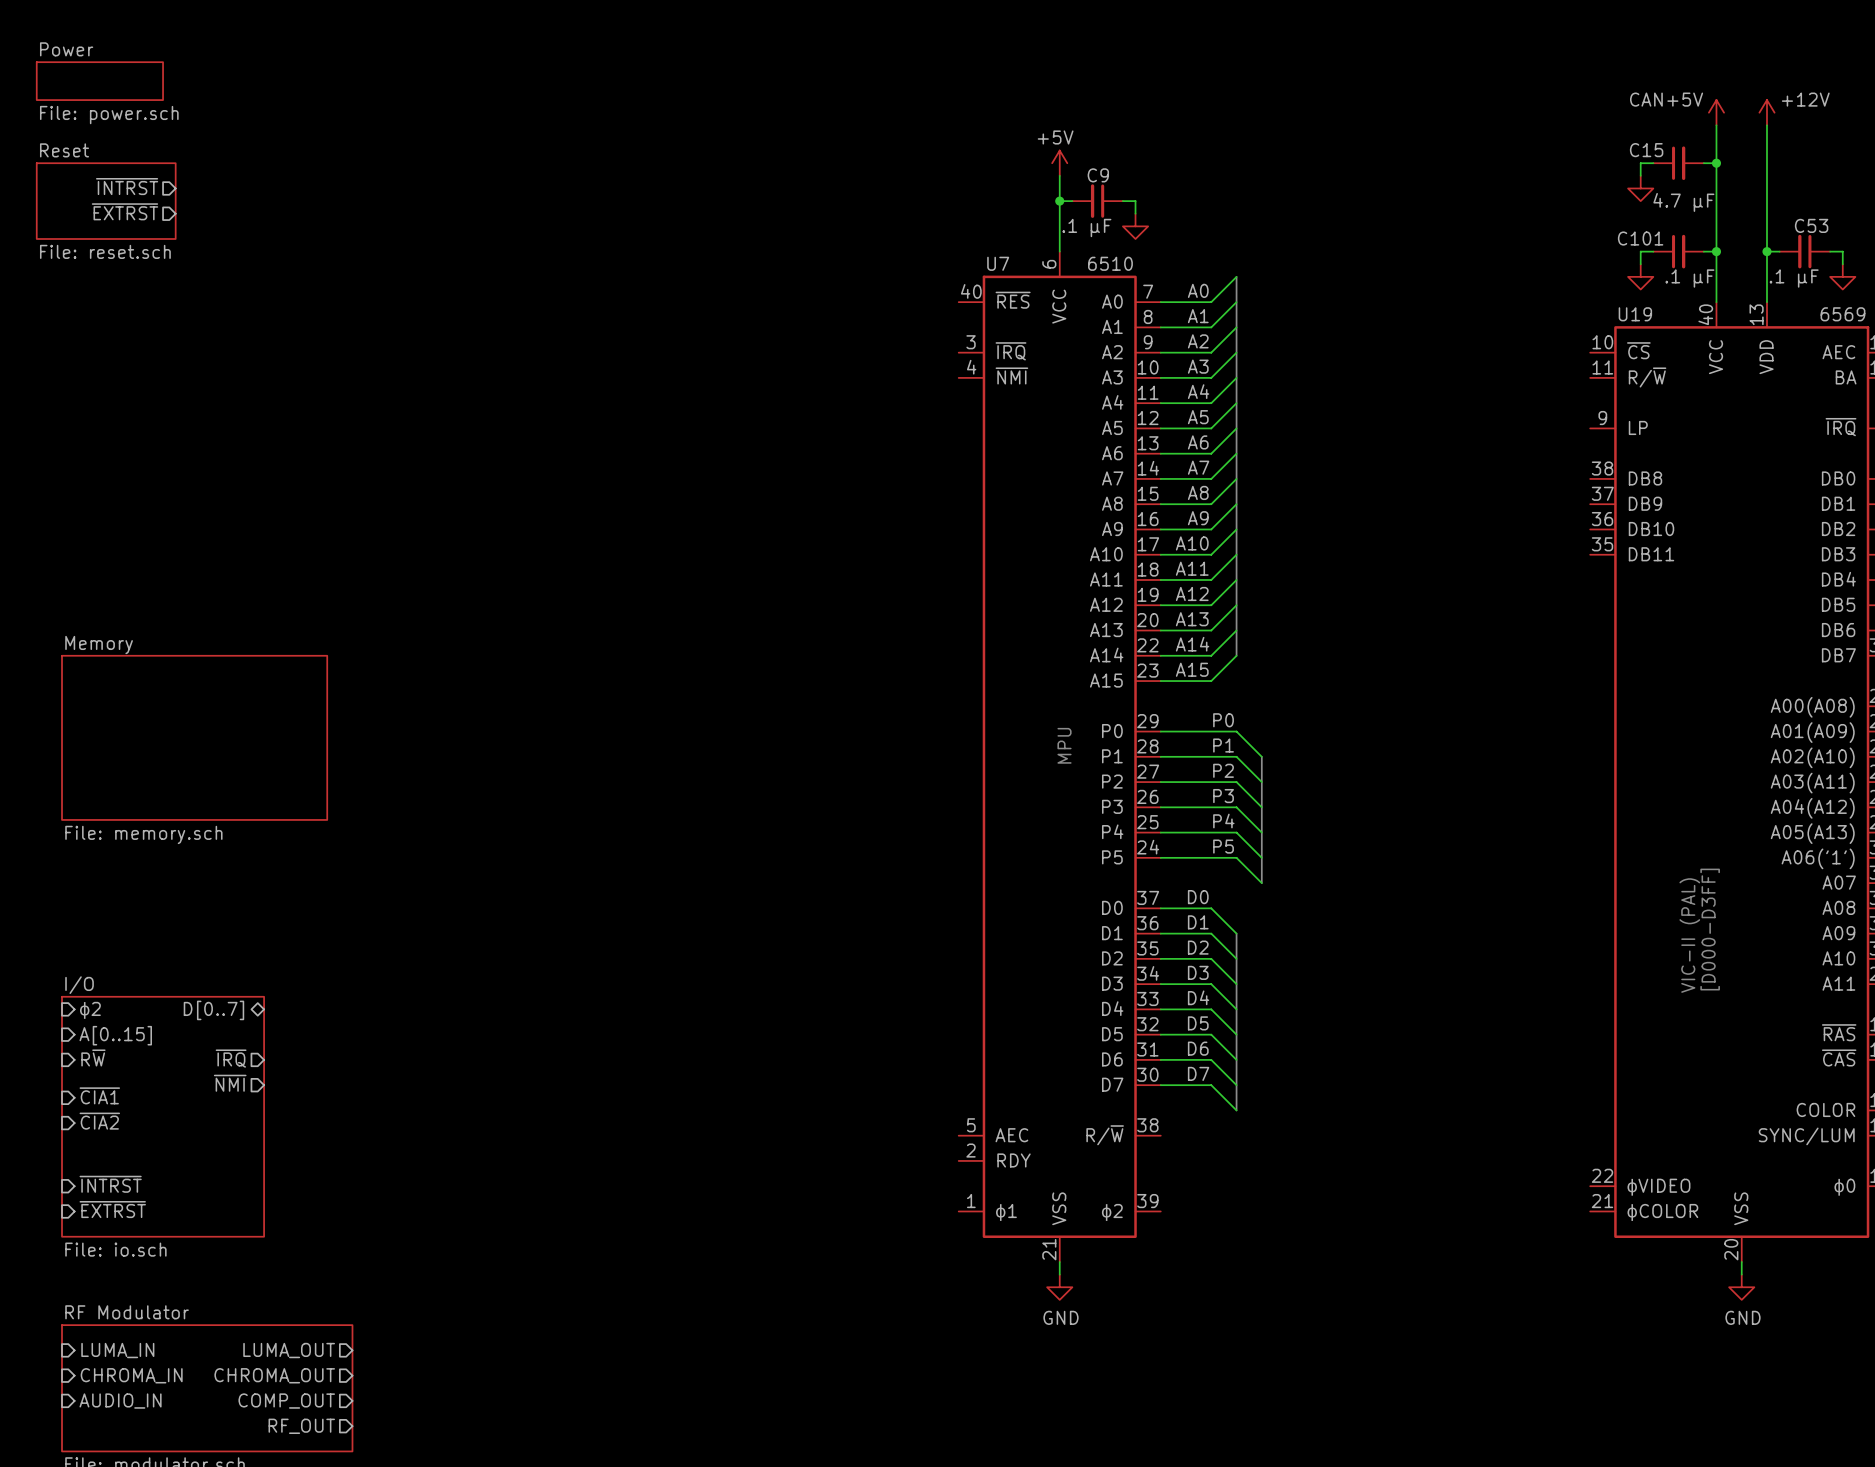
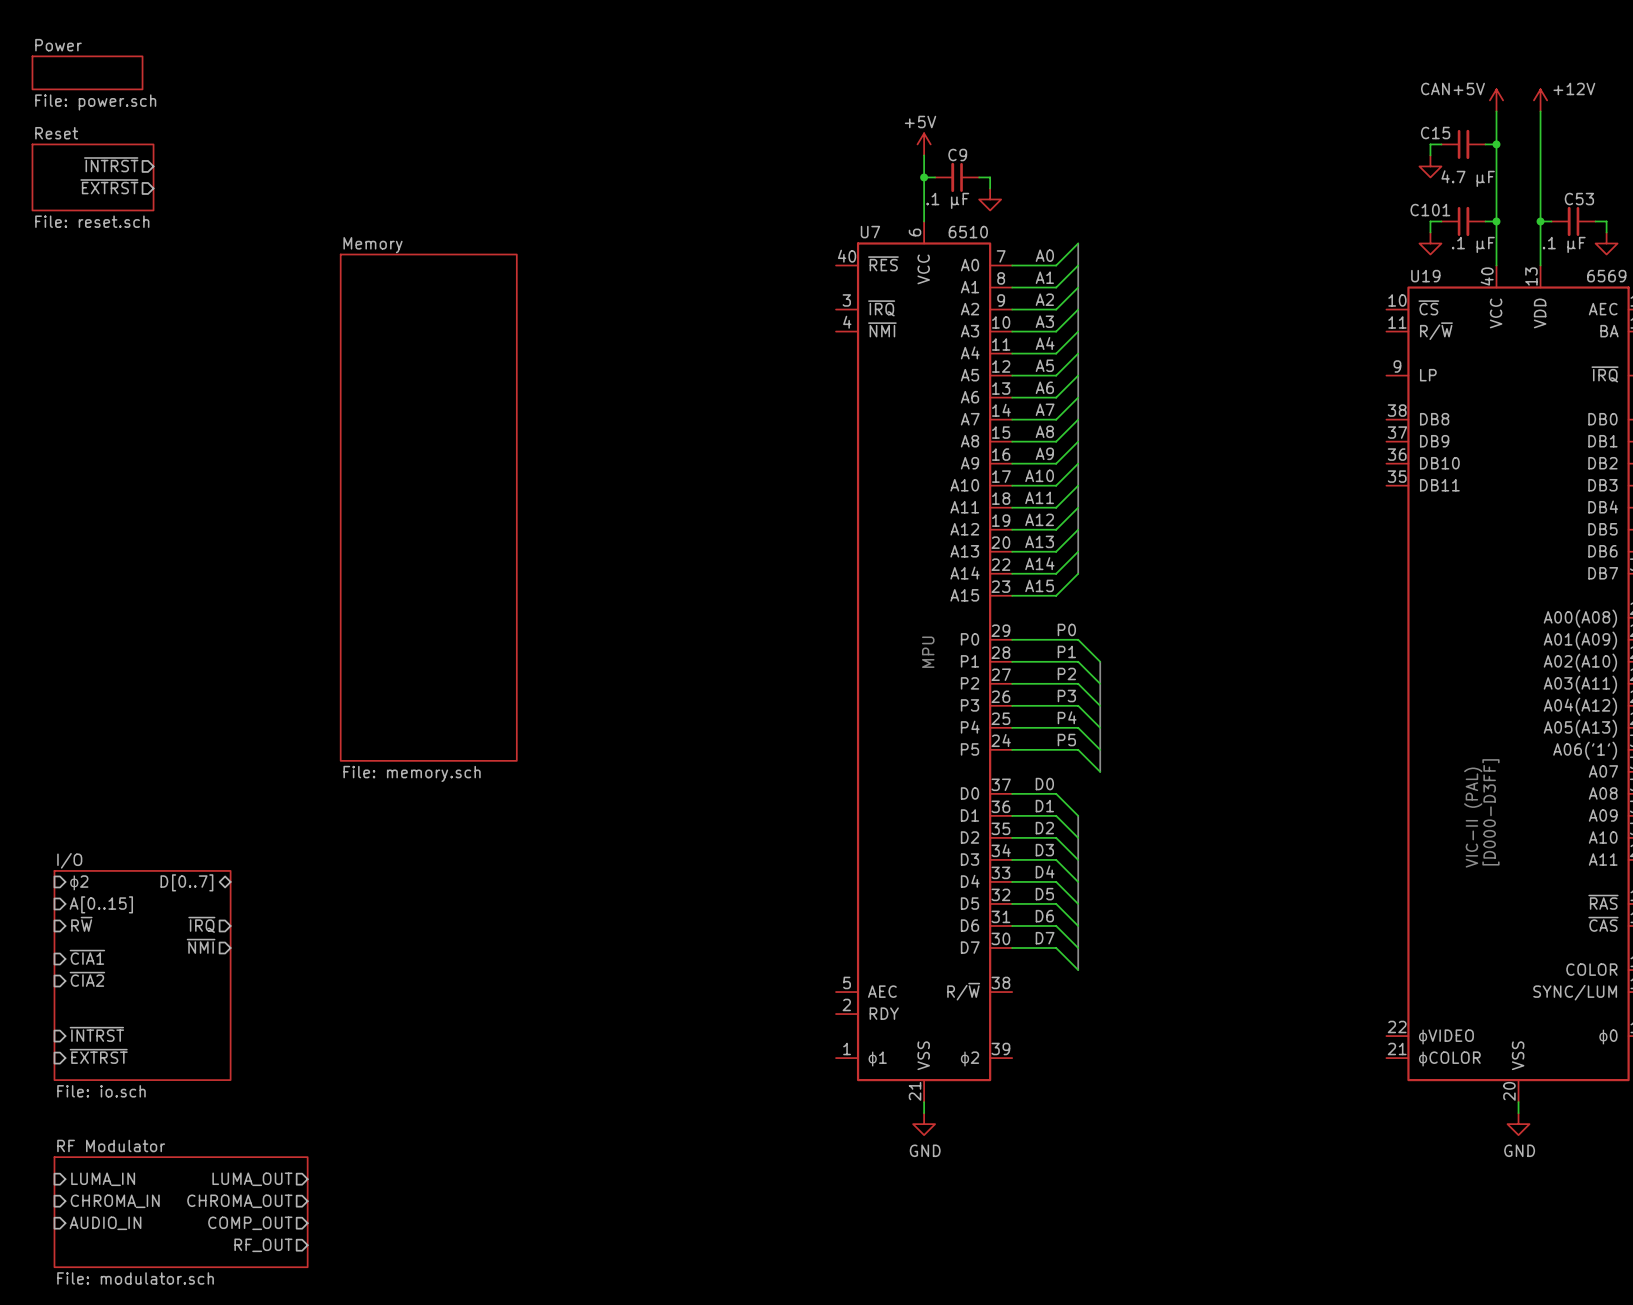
sheet Memory: none -> File: memory.sch (428, 507)
sheet Memory: File: memory.sch (194, 737) -> none

